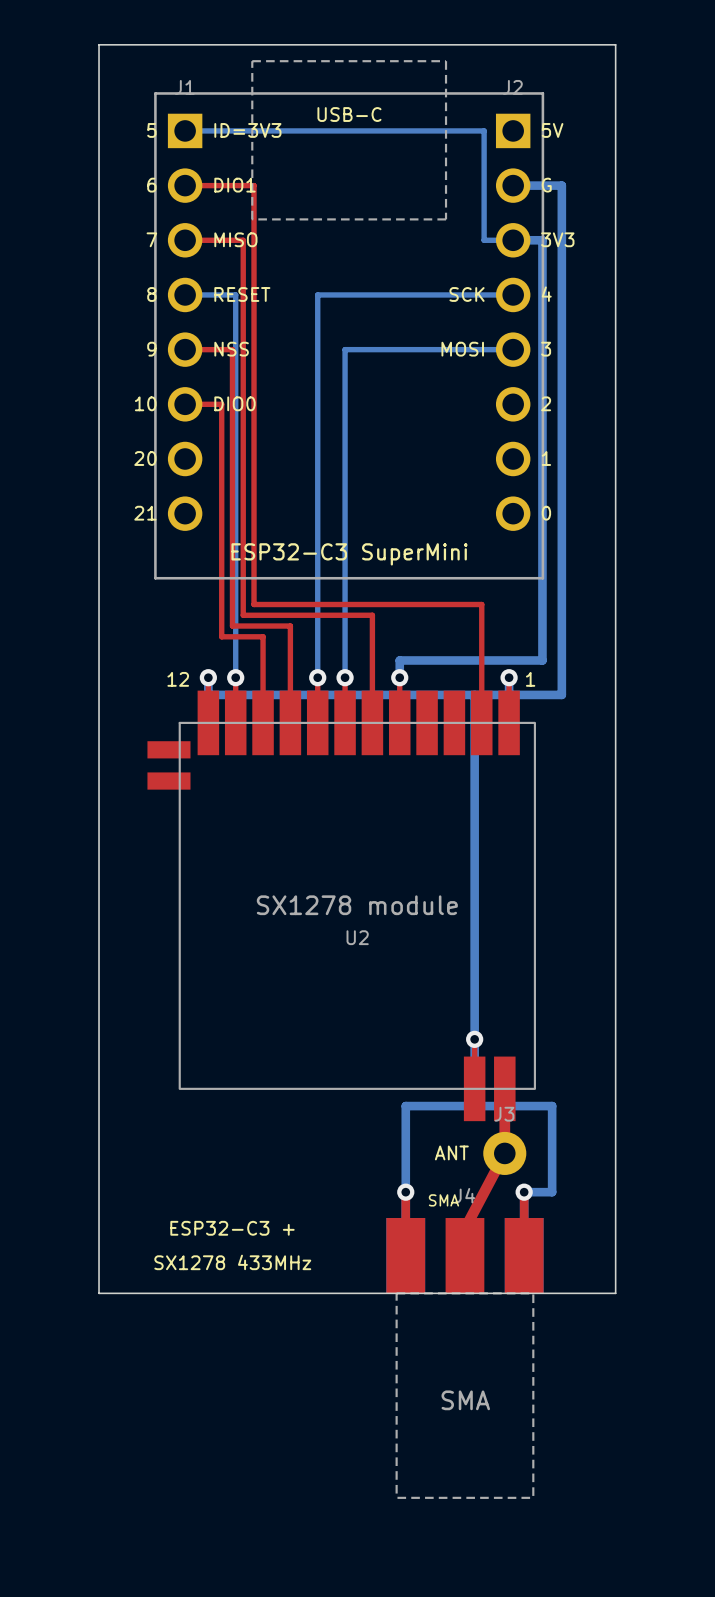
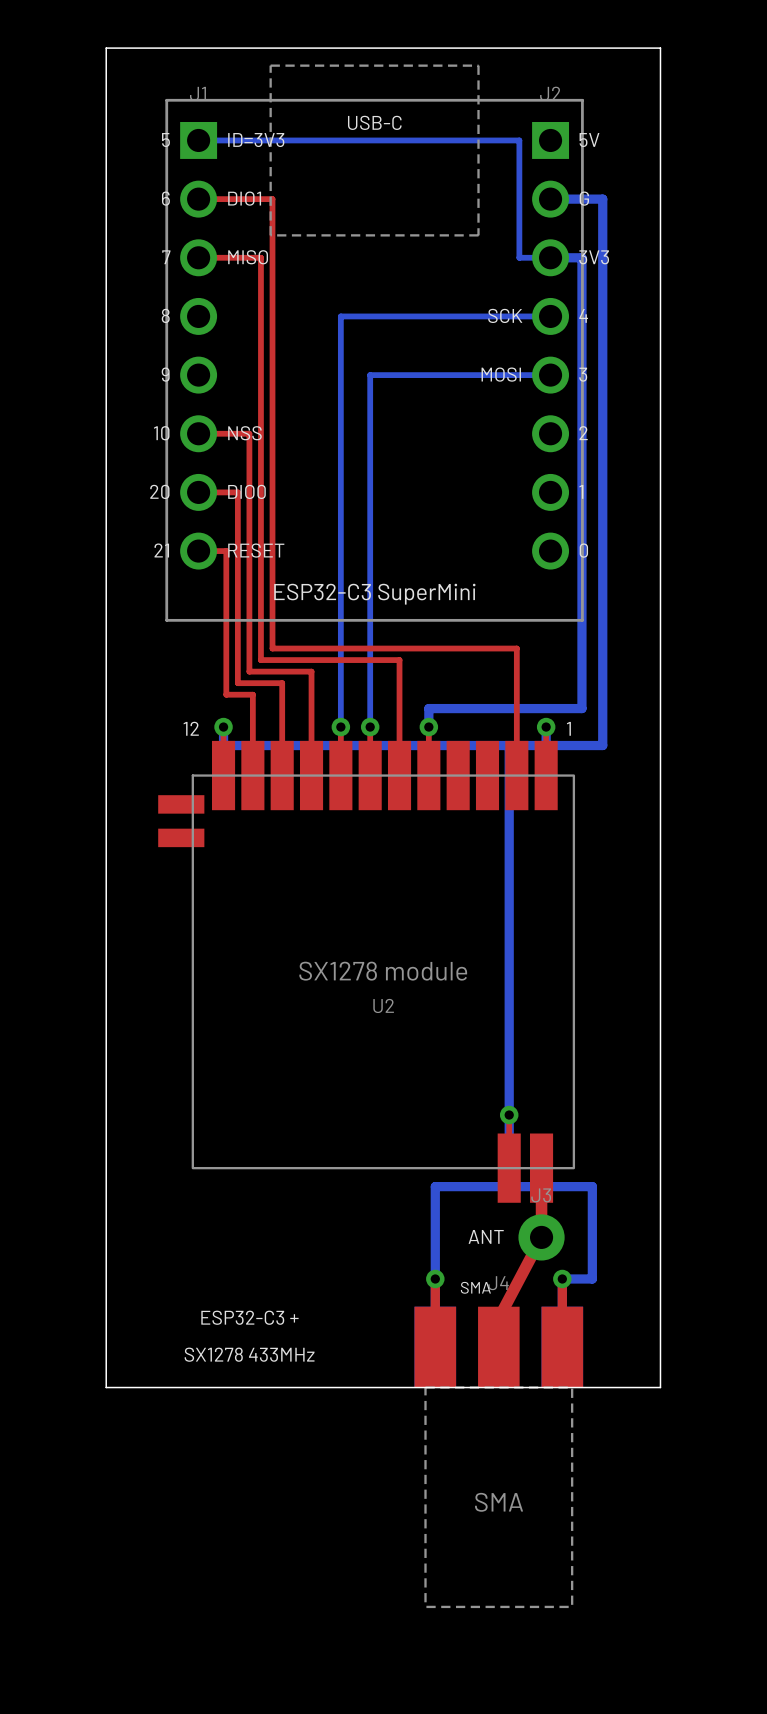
bottom track: (185, 294) (235, 294) (235, 677) -> none
text position: RESET (242, 294) -> RESET (256, 550)
top track: (185, 349) (232, 349) (232, 404) -> none
text: NSS (231, 349) -> none
text: DIO0 (234, 403) -> NSS (244, 433)
top track: (221, 404) (221, 458) -> (237, 433) (249, 433)
top track: none -> (198, 492) (237, 492)
text: none -> DIO0 (246, 491)
top track: none -> (198, 551) (226, 551) (226, 694) (252, 694) (252, 727)
via: (235, 677) -> none

